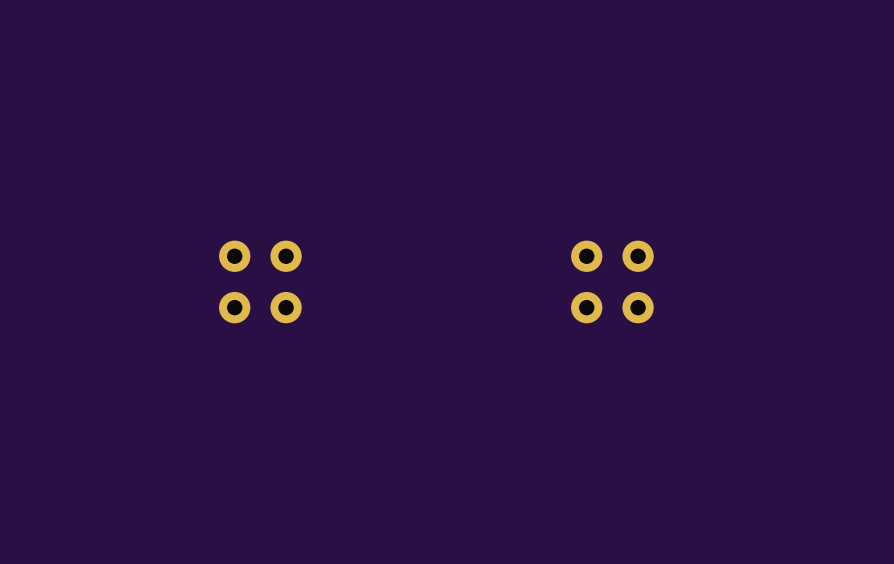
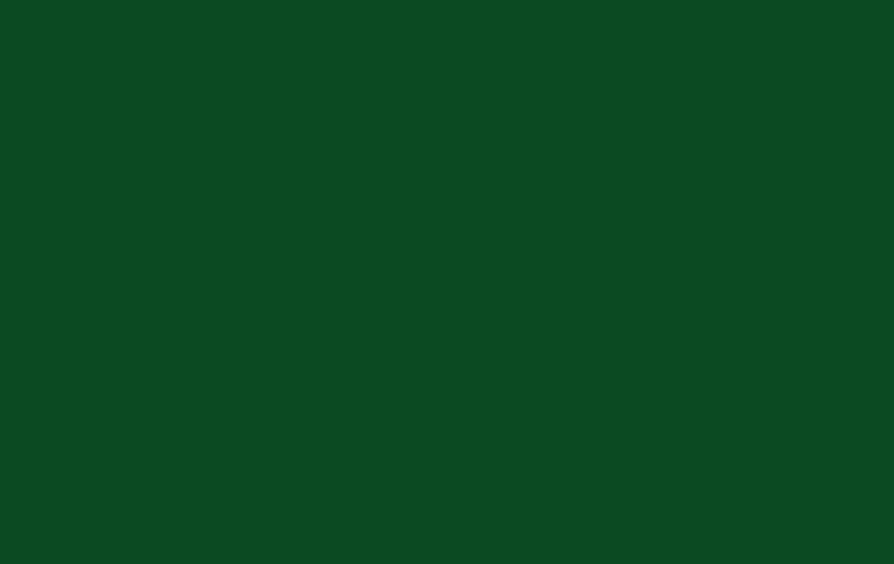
part: (260, 281) -> none
part: (612, 281) -> none

